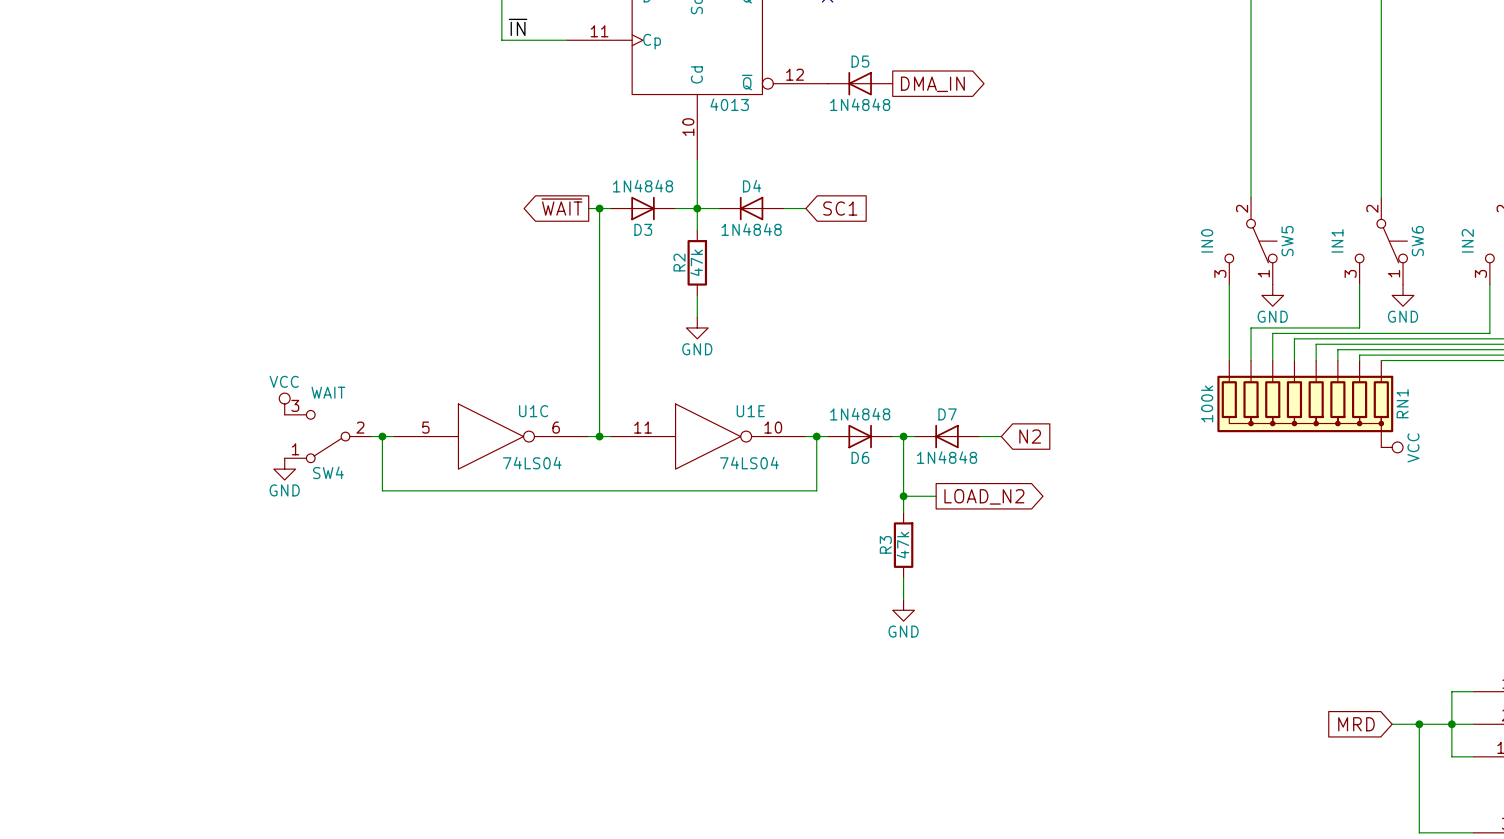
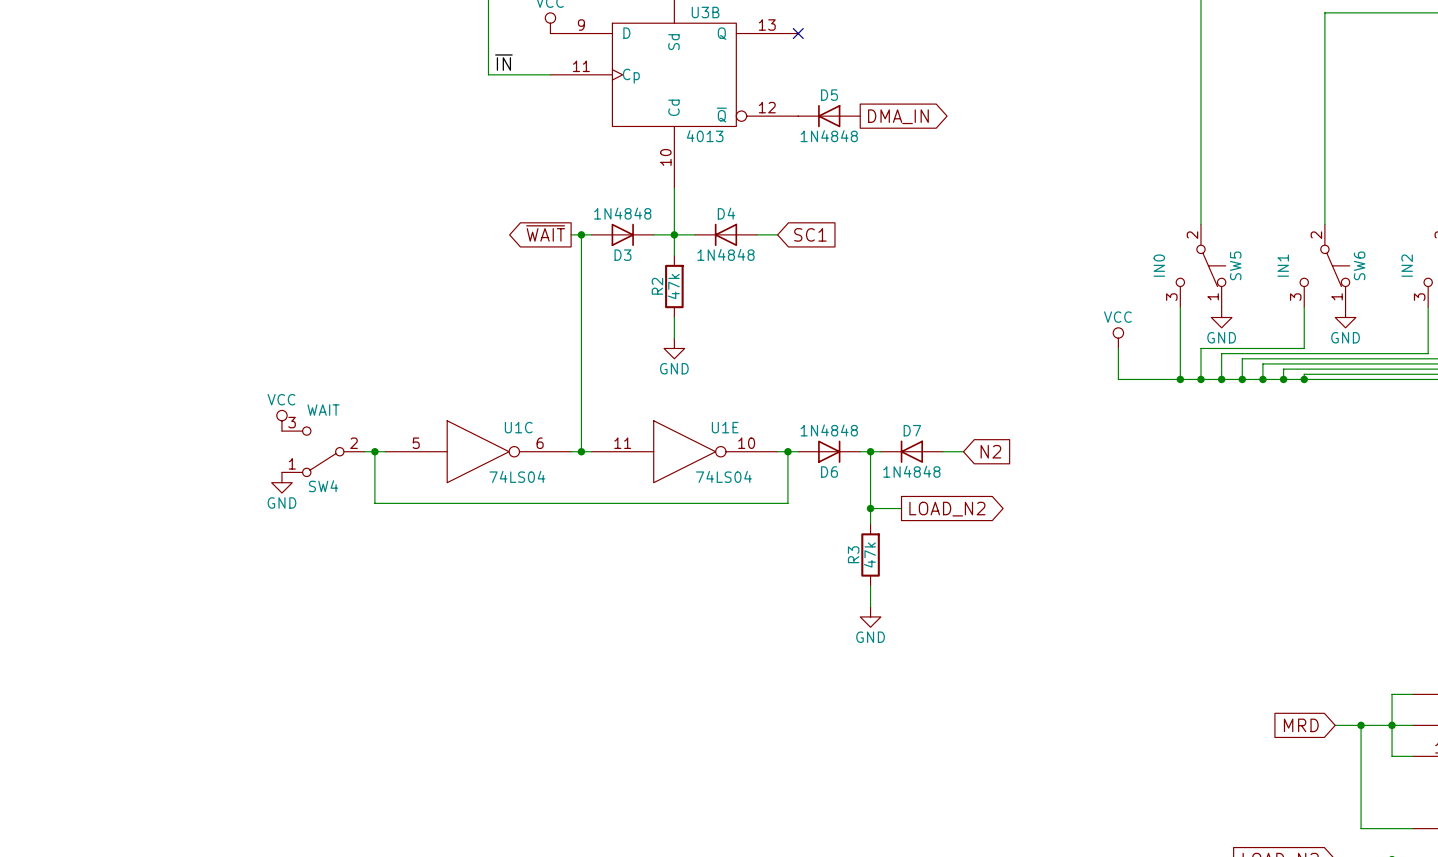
power symbol: none -> VCC (1118, 338)
wire: none -> (1118, 348) (1118, 379) (1324, 379)
junction: none -> (1180, 379)
junction: none -> (1200, 379)
junction: none -> (1221, 379)
junction: none -> (1242, 379)
junction: none -> (1262, 379)
junction: none -> (1283, 379)
junction: none -> (1304, 379)
RN1: 100k (1305, 403) -> none
power symbol: VCC (1392, 447) -> none

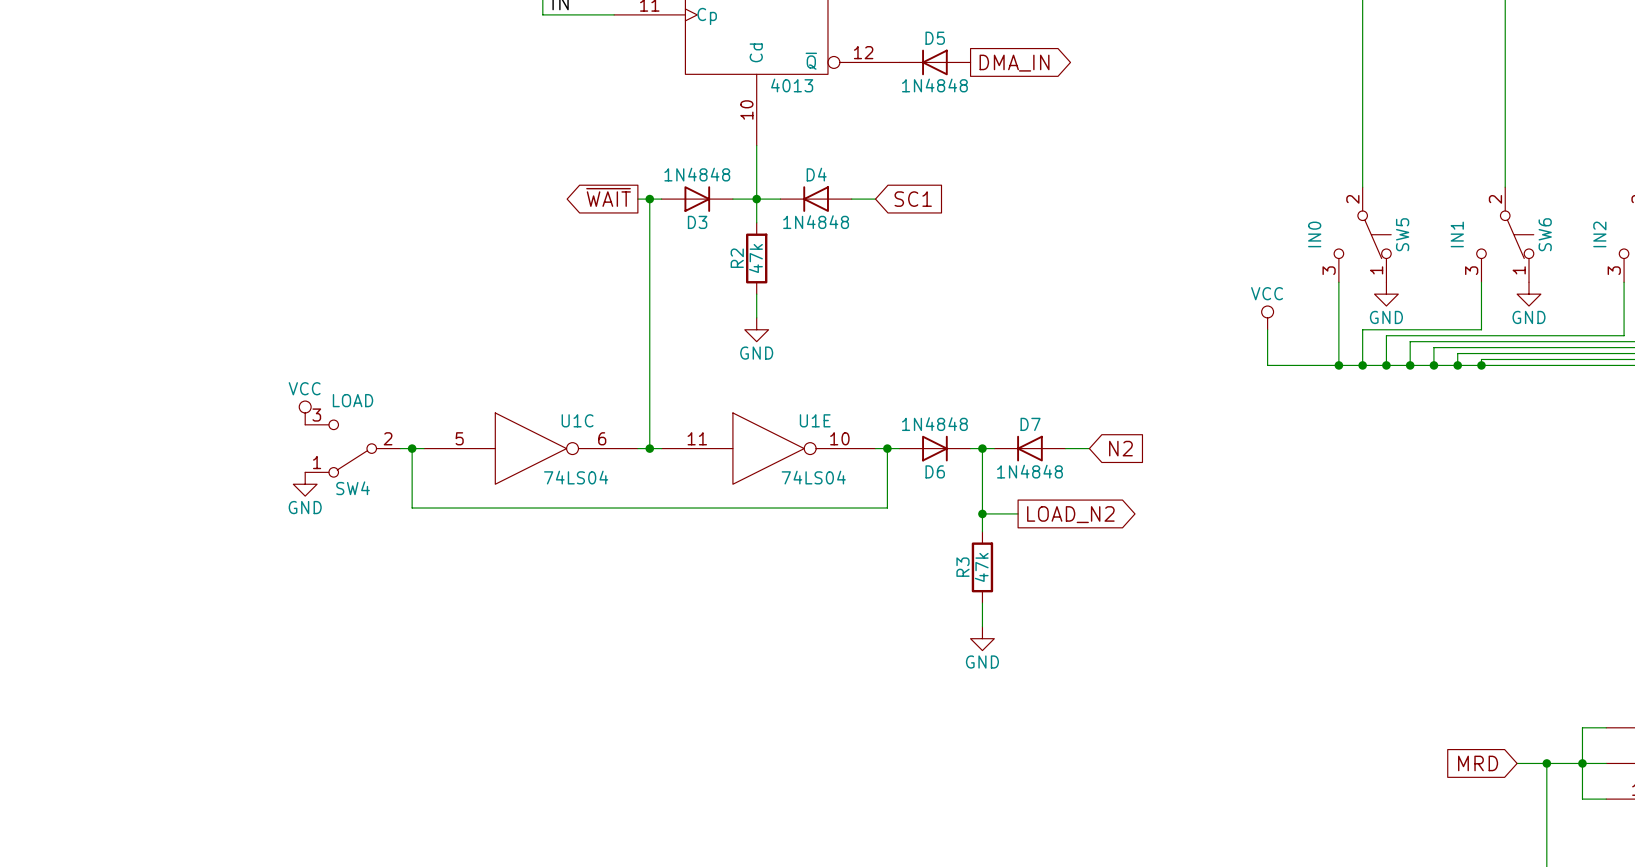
SW4 value: WAIT (323, 410) -> LOAD (353, 400)

